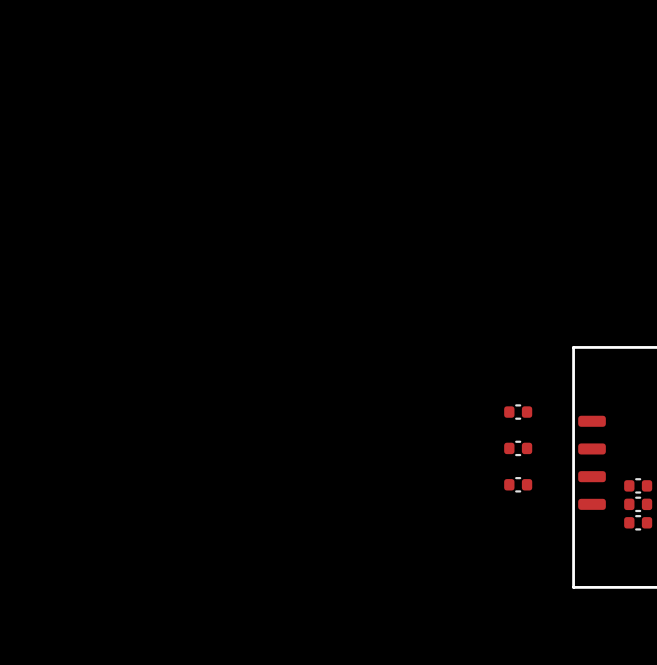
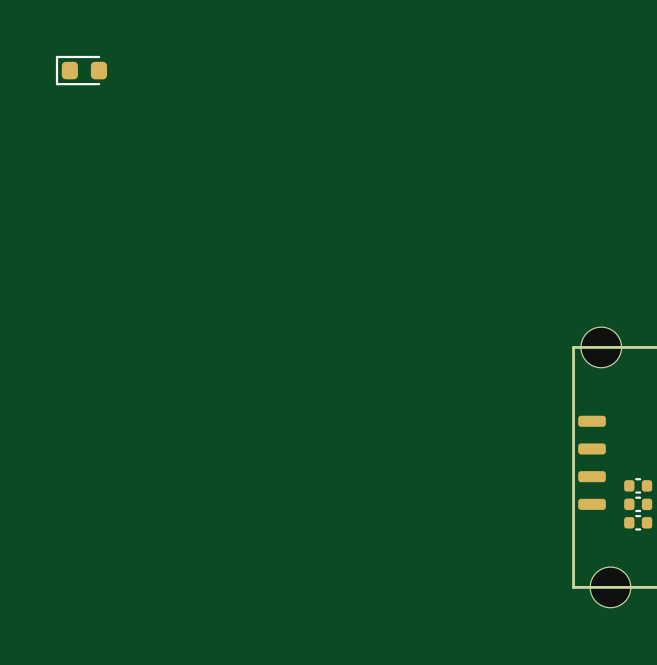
part: none -> (81, 70)
part: none -> (601, 347)
part: (518, 412) -> none
part: (518, 448) -> none
part: (518, 484) -> none
part: none -> (610, 587)

